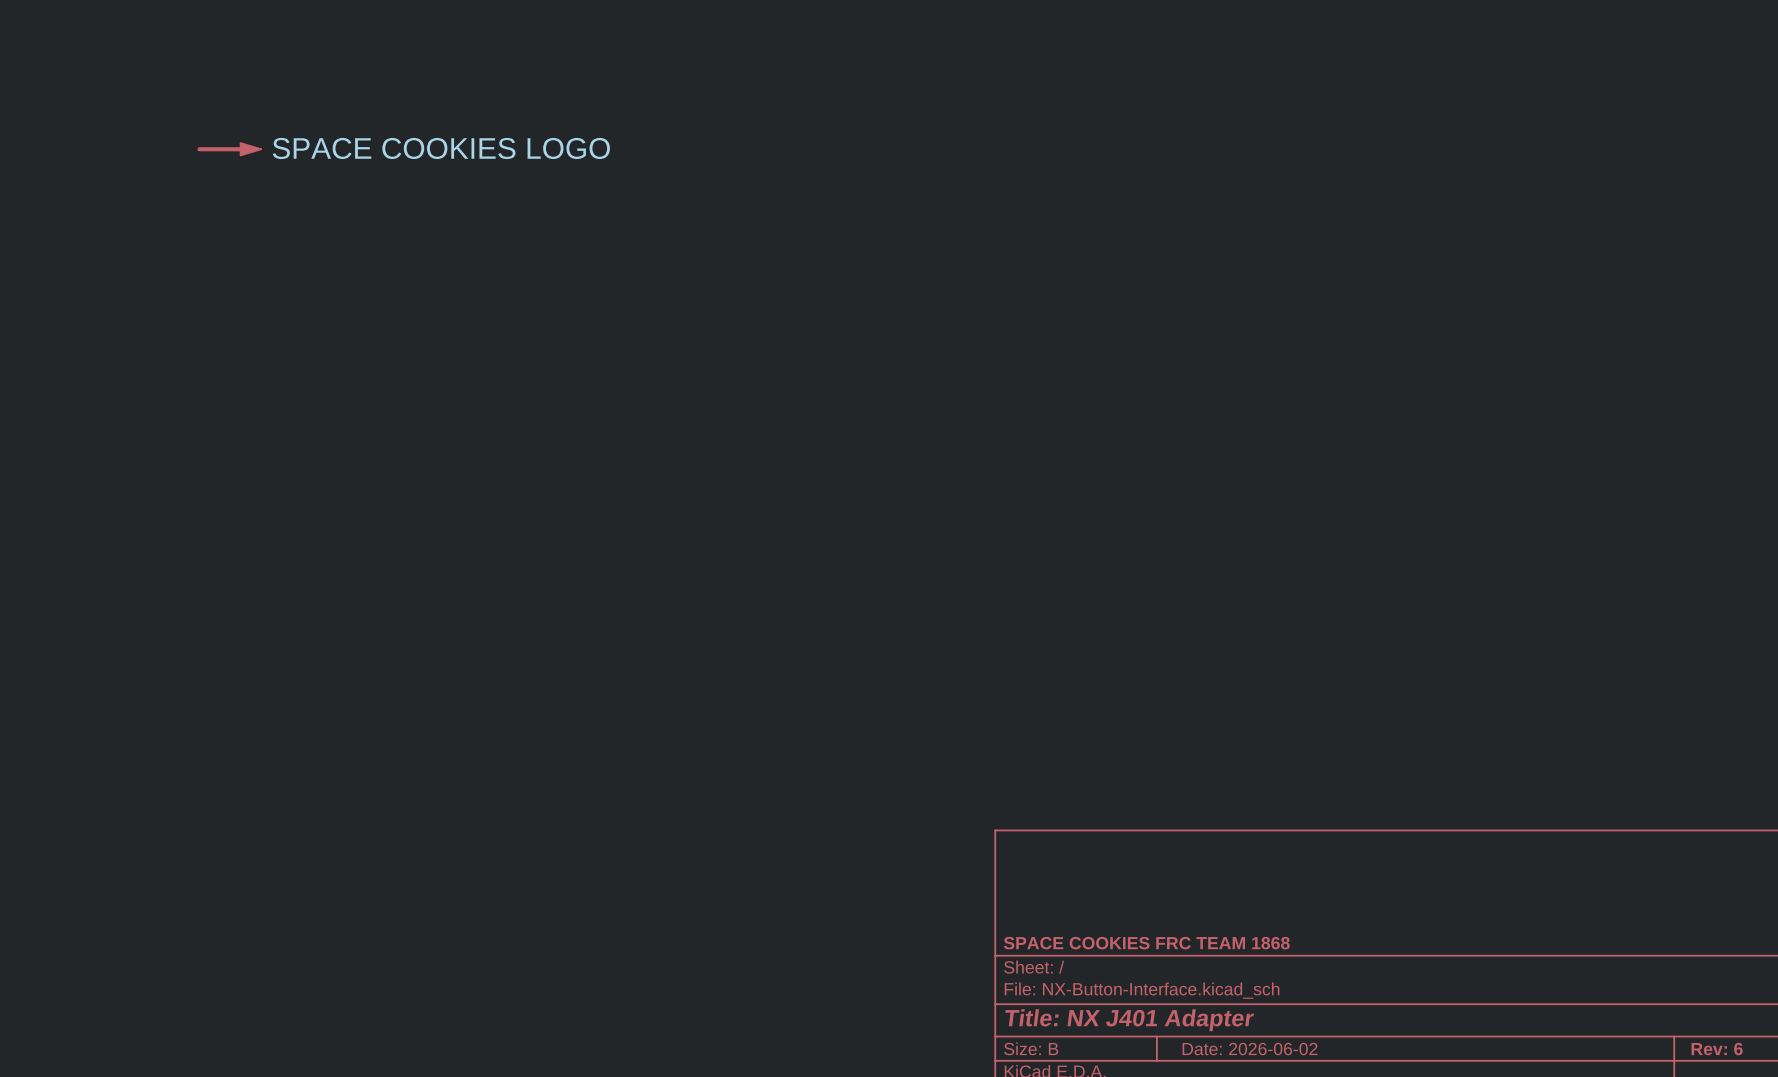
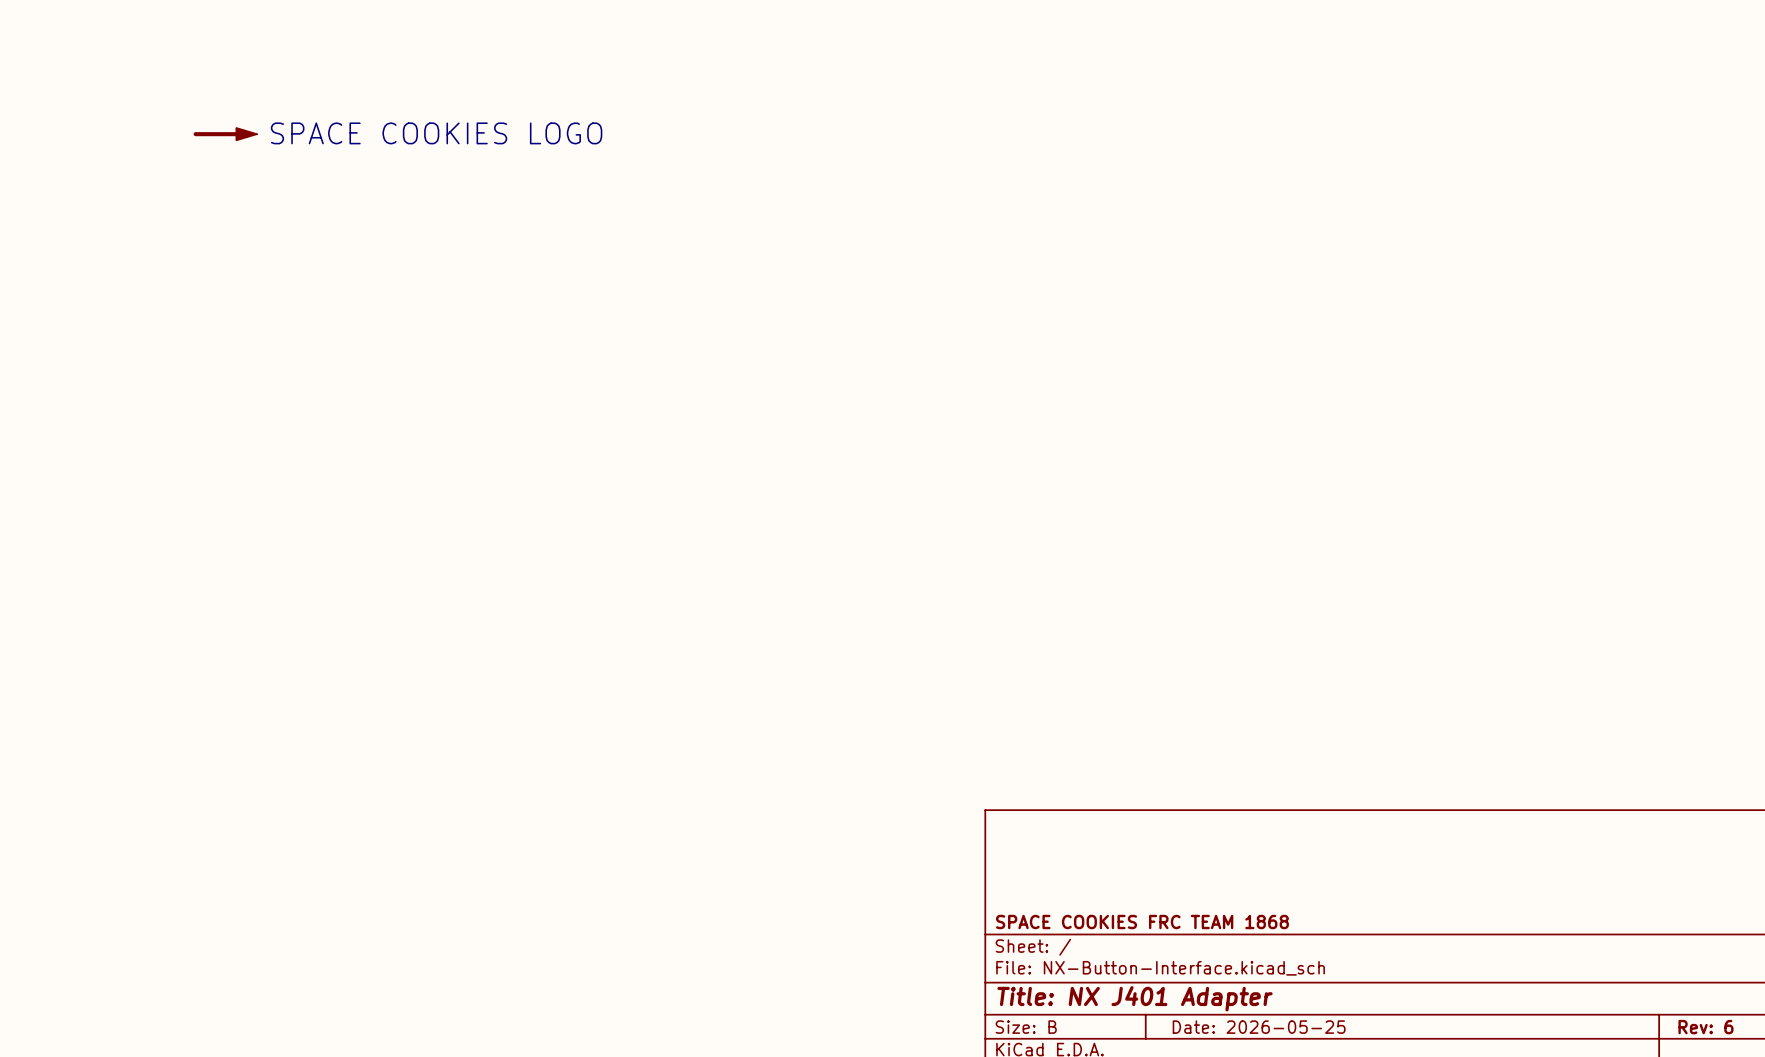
title block: Date: 2026-06-02 (1250, 1049) -> Date: 2026-05-25 (1259, 1027)

